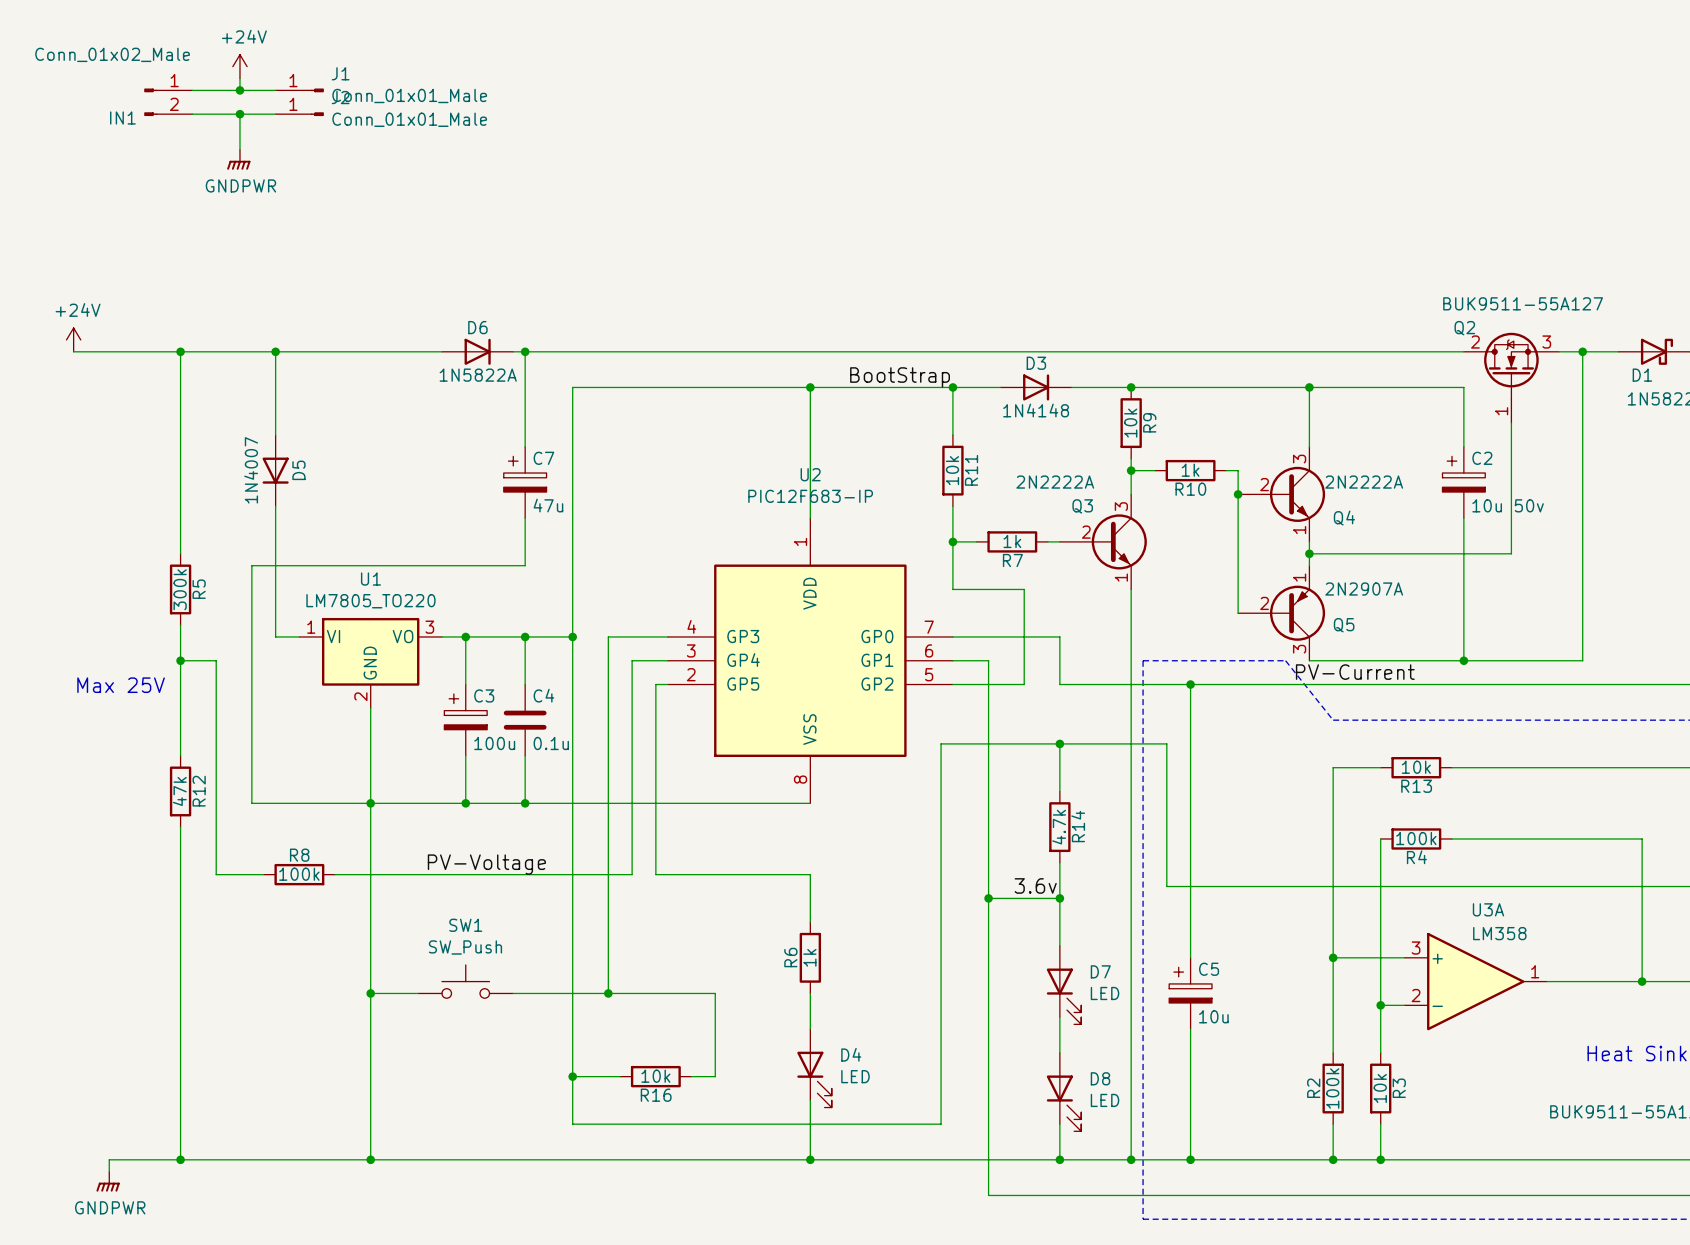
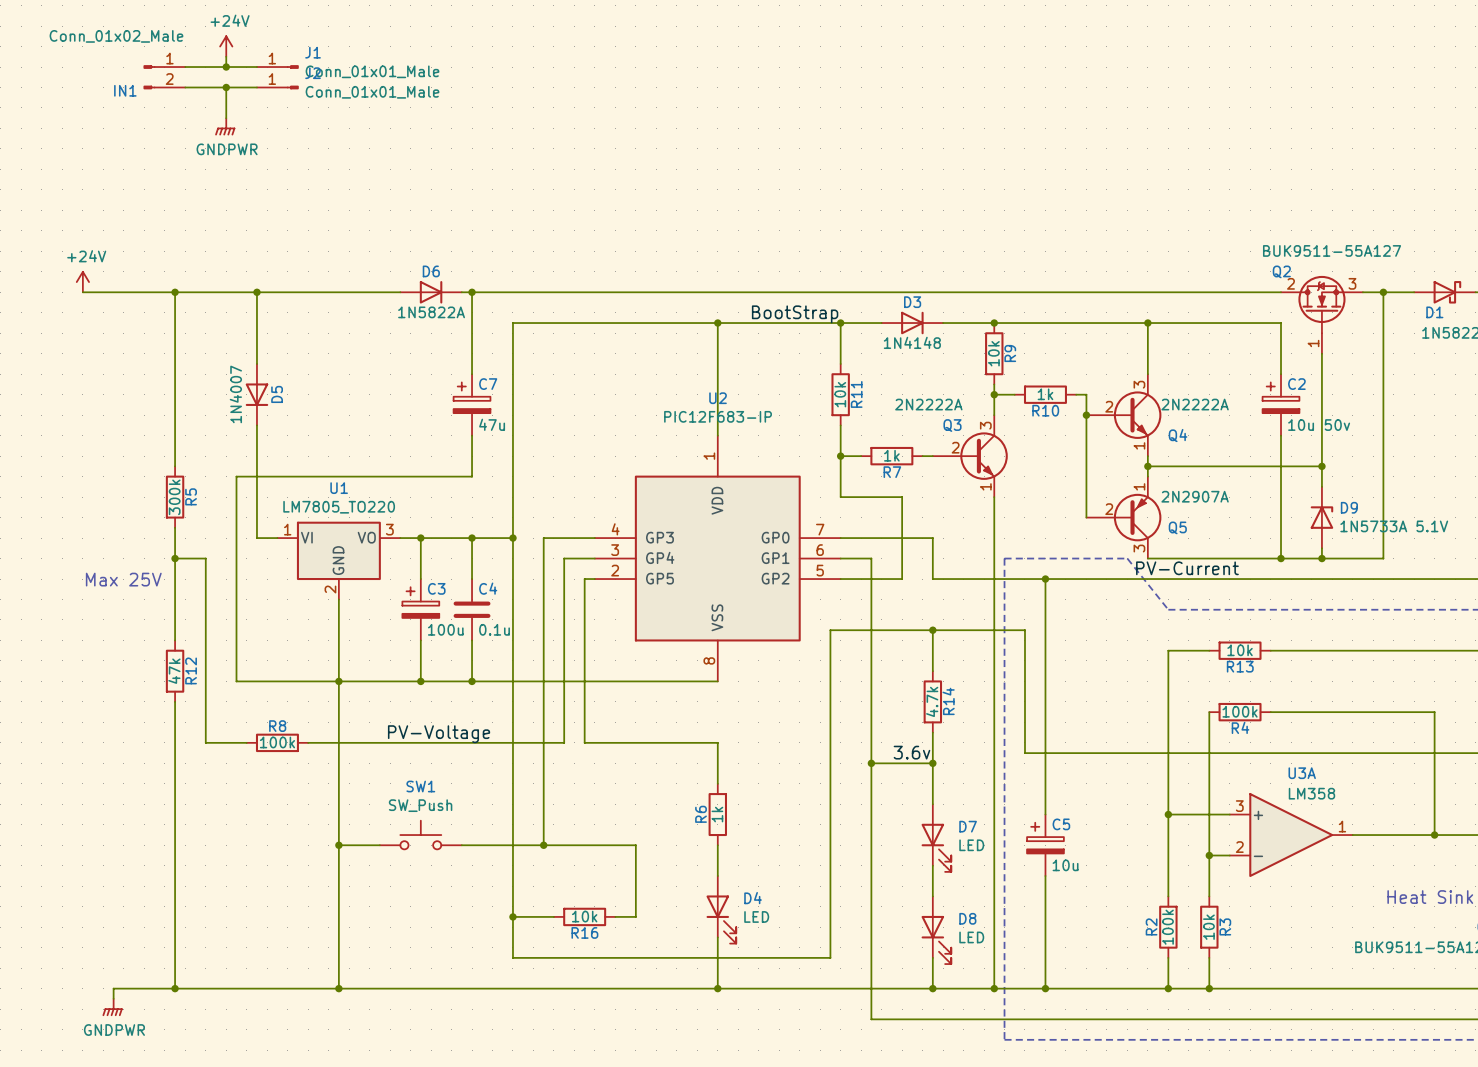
wire: none -> (1321, 466) (1321, 486)
junction: none -> (1321, 466)
D9: none -> 1N5733A 5.1V (1321, 517)
wire: none -> (1321, 548) (1321, 558)
junction: none -> (1321, 558)

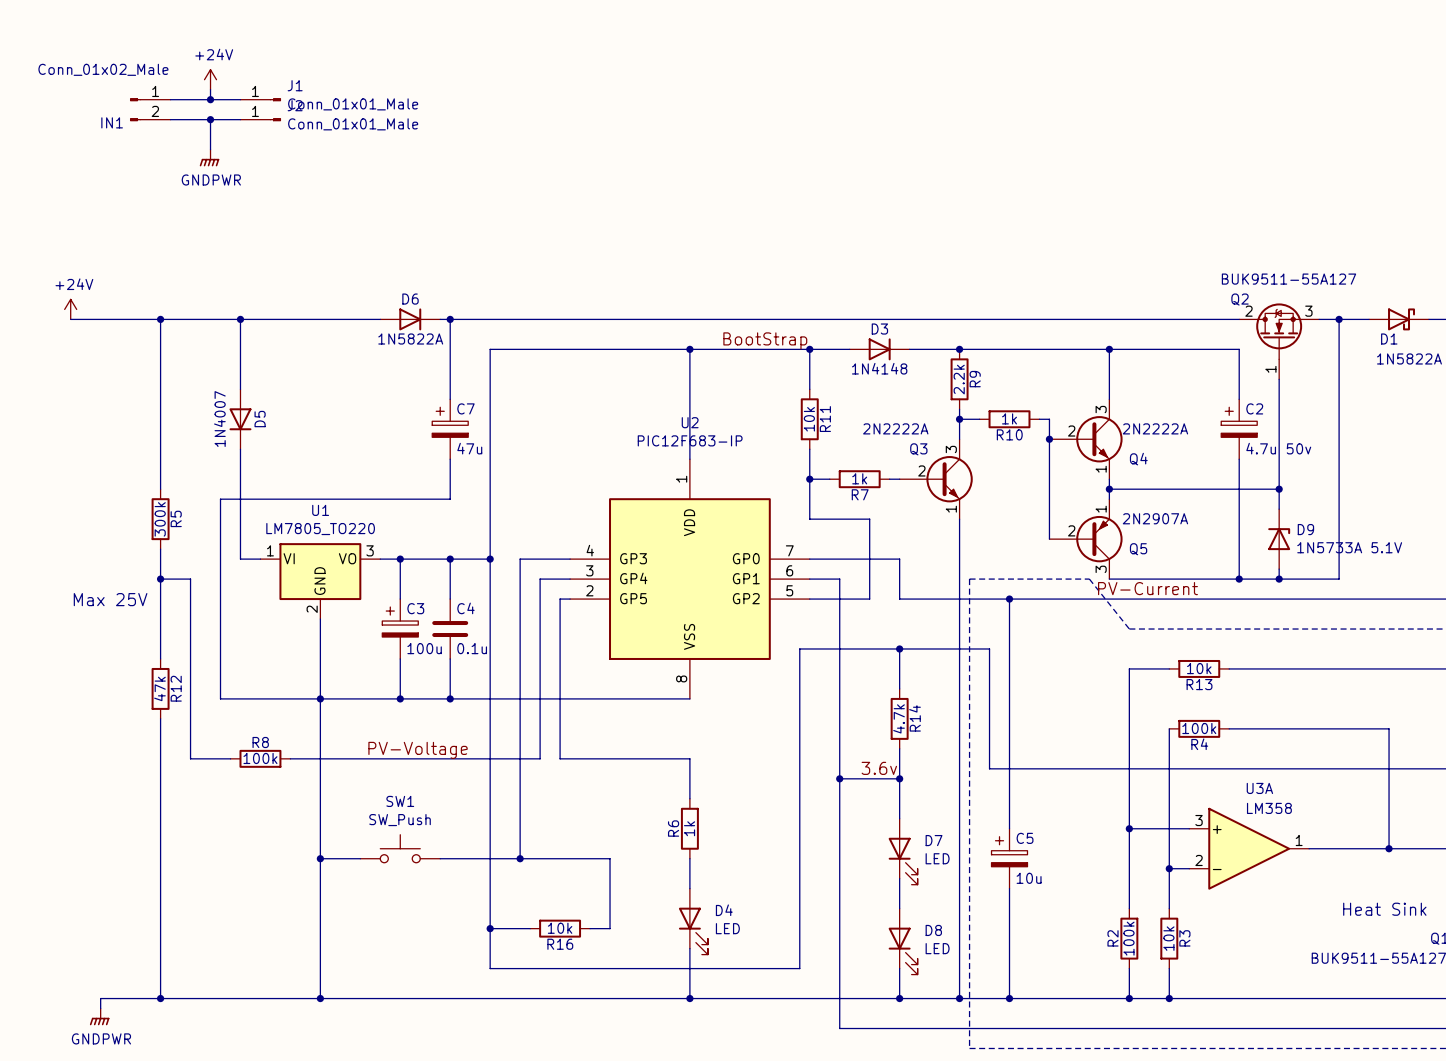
R9 value: 10k (993, 353) -> 2.2k (959, 379)
C2 value: 10u 50v (1319, 425) -> 4.7u 50v (1278, 448)

